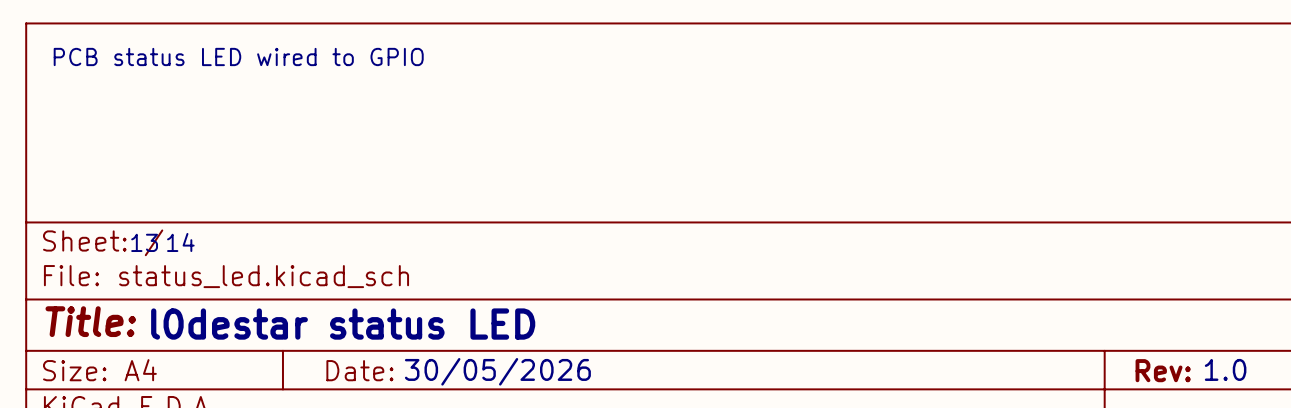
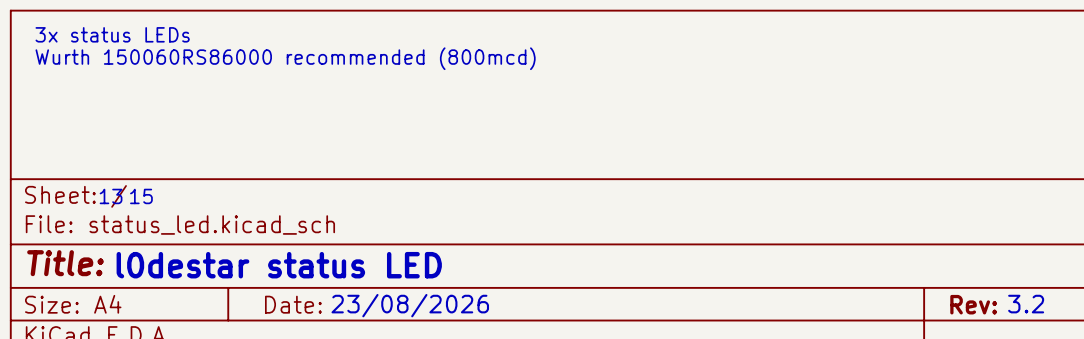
text: PCB status LED wired to GPIO (238, 56) -> 3x status LEDs (112, 34)
text: none -> Wurth 150060RS86000 recommended (800mcd) (285, 58)
text: 14 (180, 242) -> 15 (141, 196)
text: 1.0 (1225, 369) -> 3.2 (1026, 304)
text: 30/05/2026 (497, 371) -> 23/08/2026 (410, 305)

